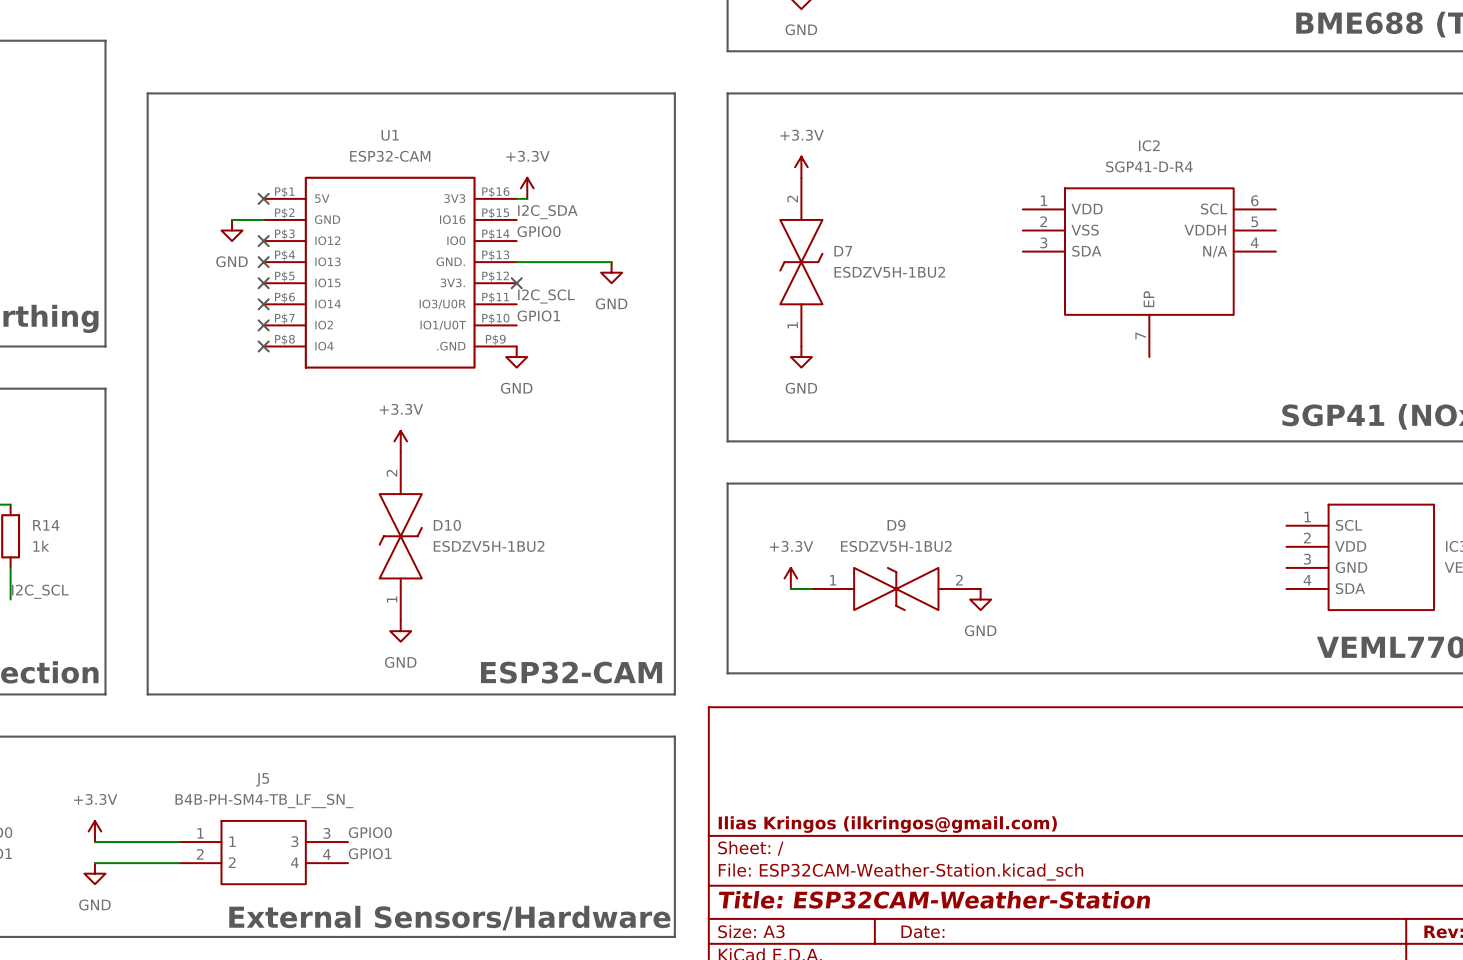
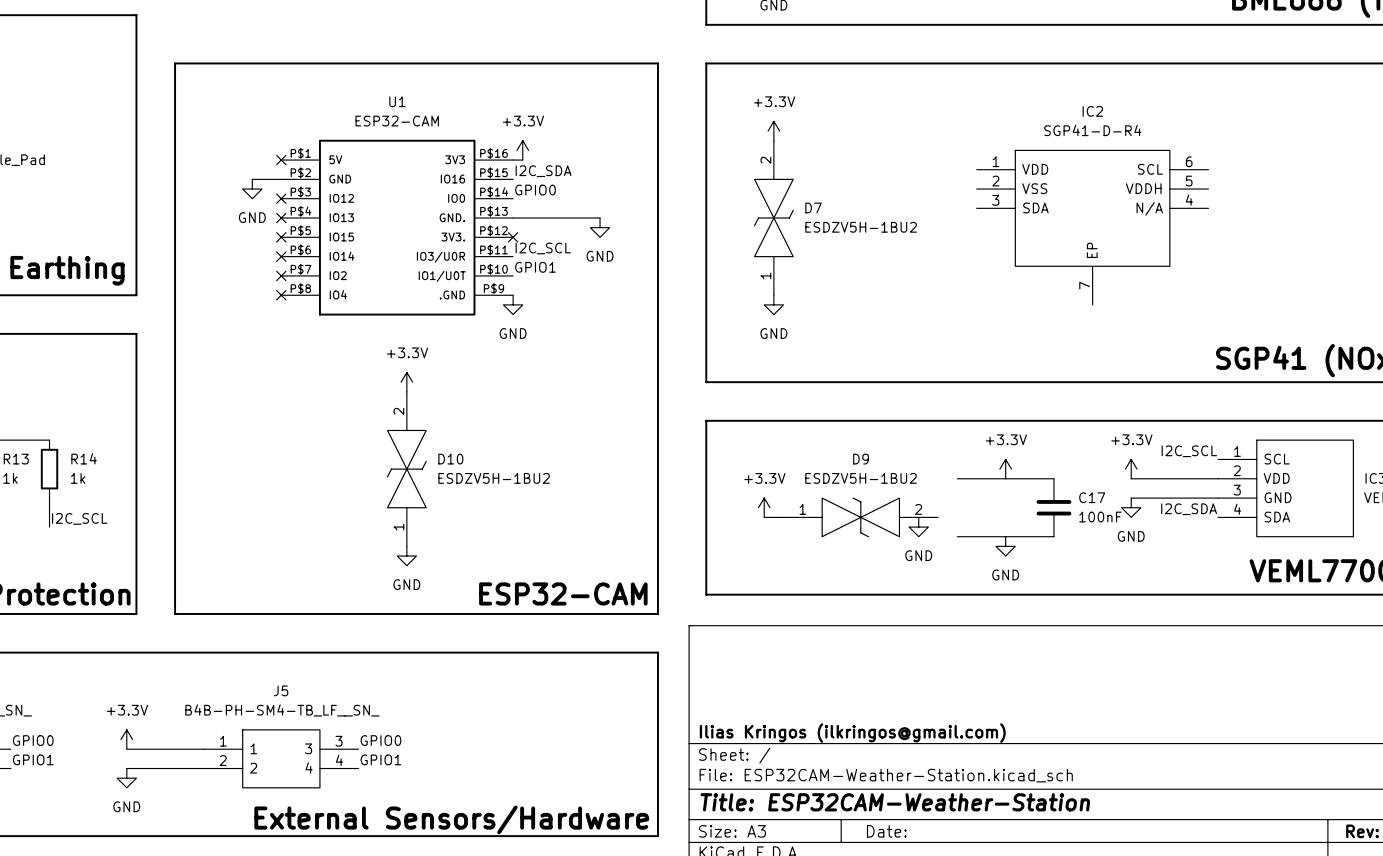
label: none -> I2C_SCL (1189, 451)
power symbol: none -> +3.3V (1005, 469)
power symbol: none -> +3.3V (1131, 469)
wire: none -> (957, 478) (1053, 478)
wire: none -> (1131, 478) (1218, 478)
wire: none -> (1131, 498) (1218, 498)
C17: none -> 100nF (1053, 507)
power symbol: none -> GND (1131, 507)
label: none -> I2C_SDA (1189, 509)
power symbol position: GND (980, 599) -> GND (918, 527)
wire: none -> (957, 536) (1053, 536)
power symbol: none -> GND (1005, 546)

